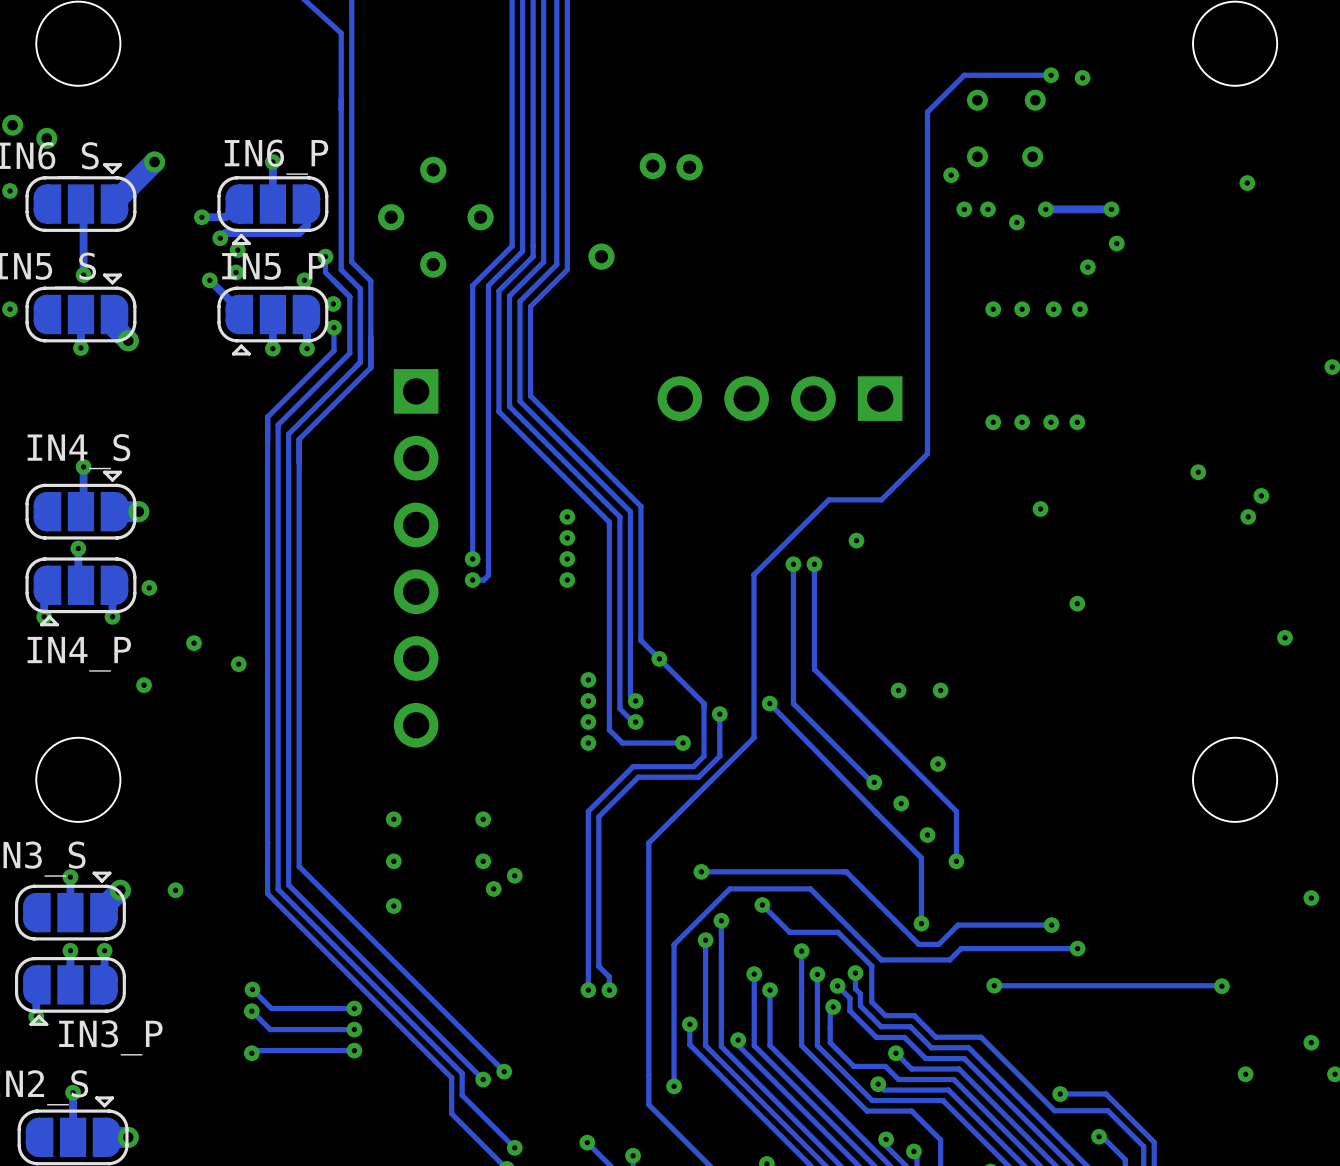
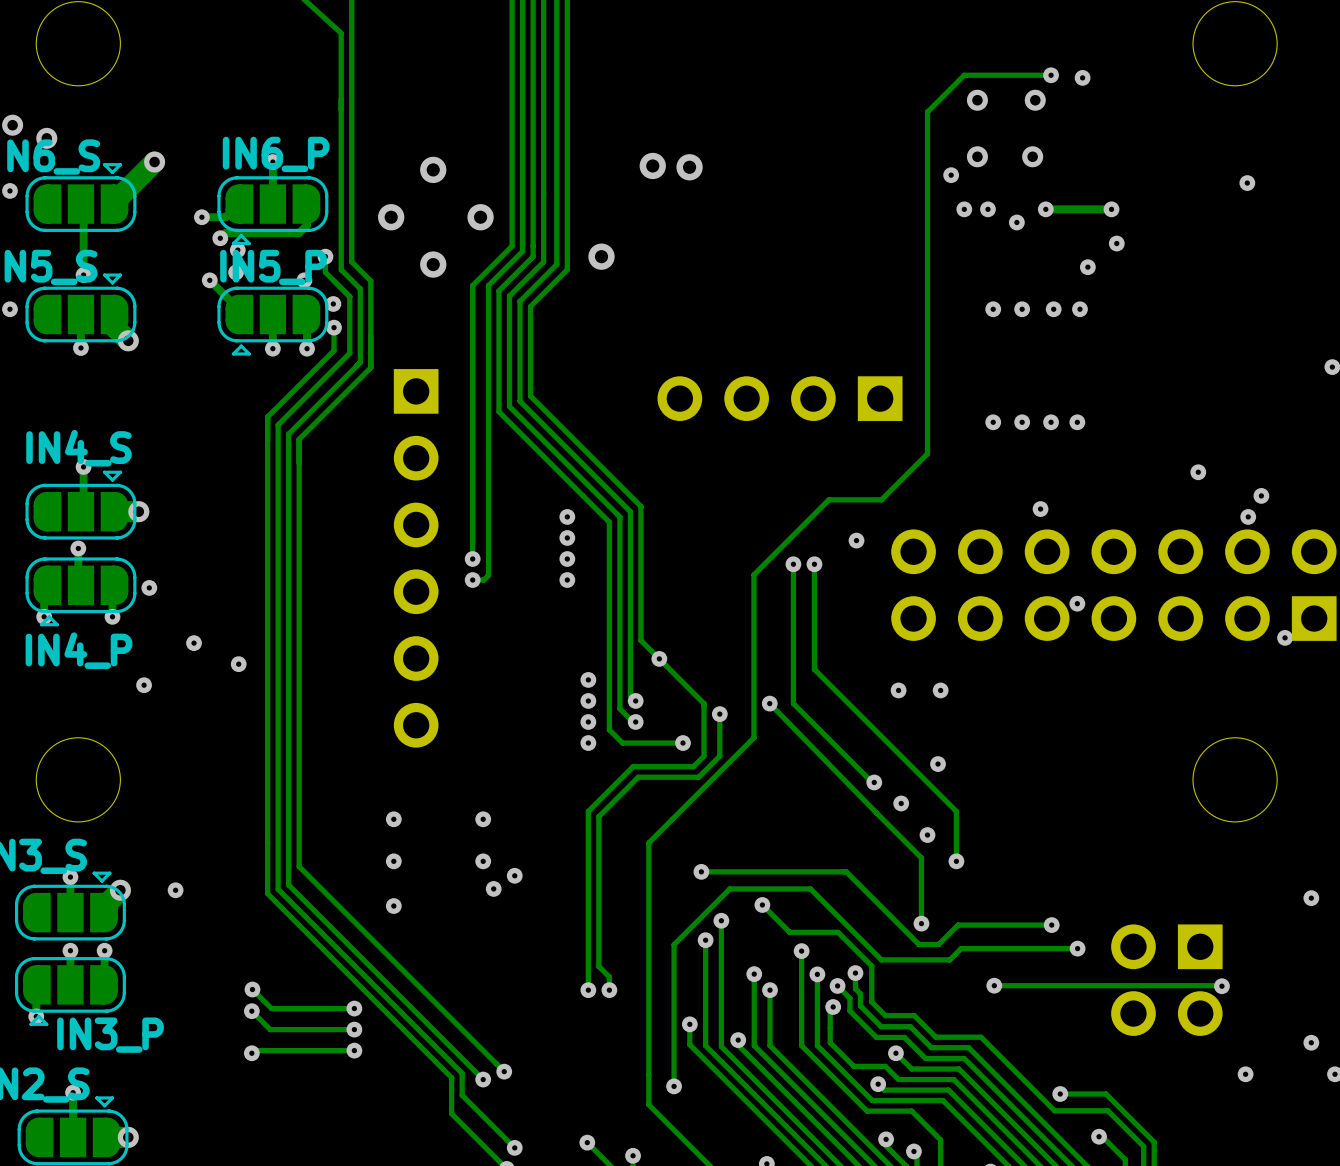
part: none -> (1113, 585)
part: none -> (1166, 980)

